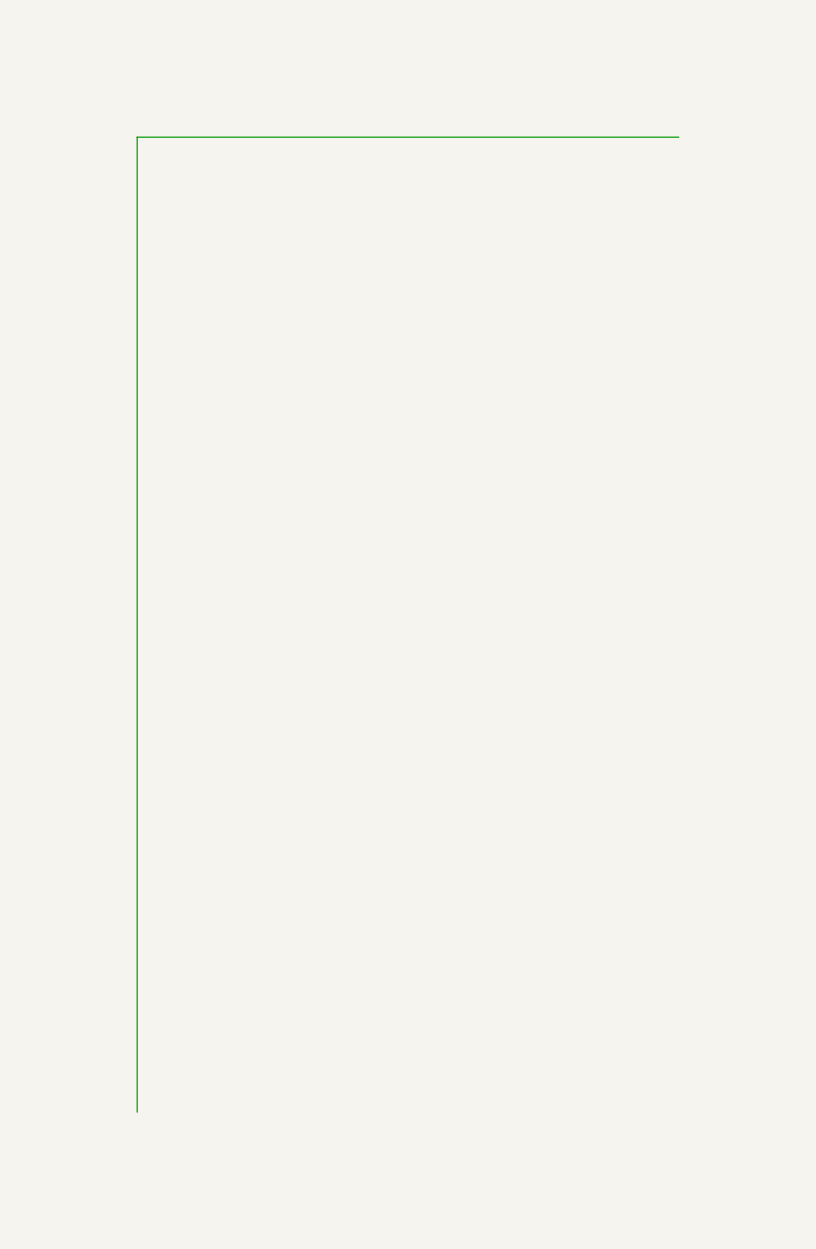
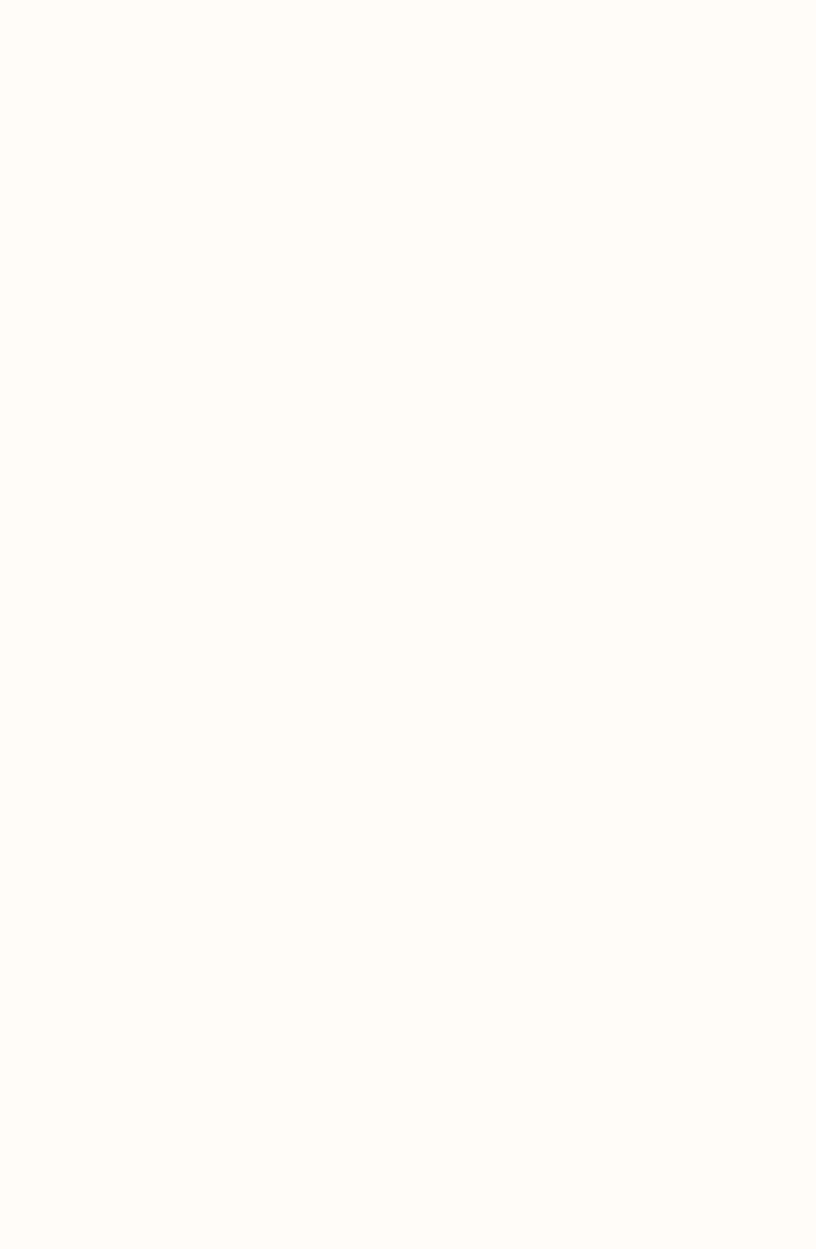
wire: (678, 137) (137, 137) (137, 1112) -> none

